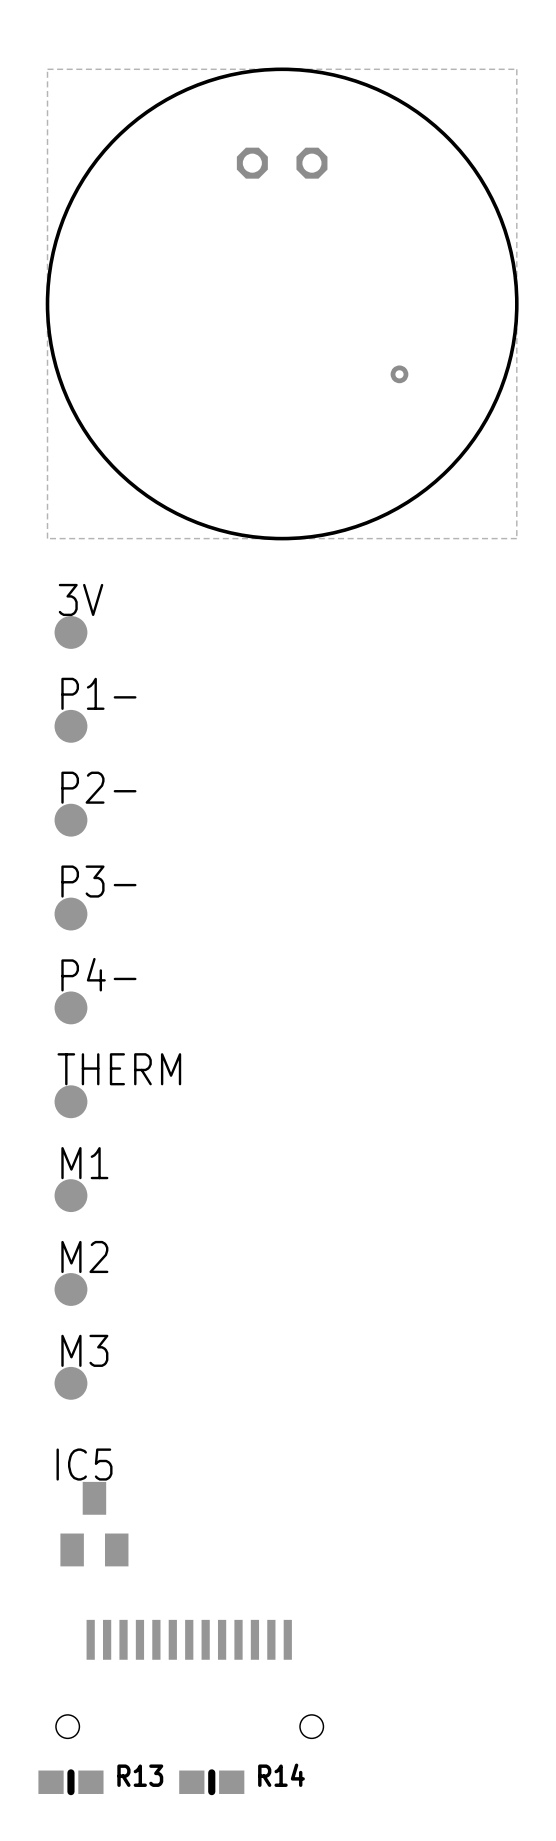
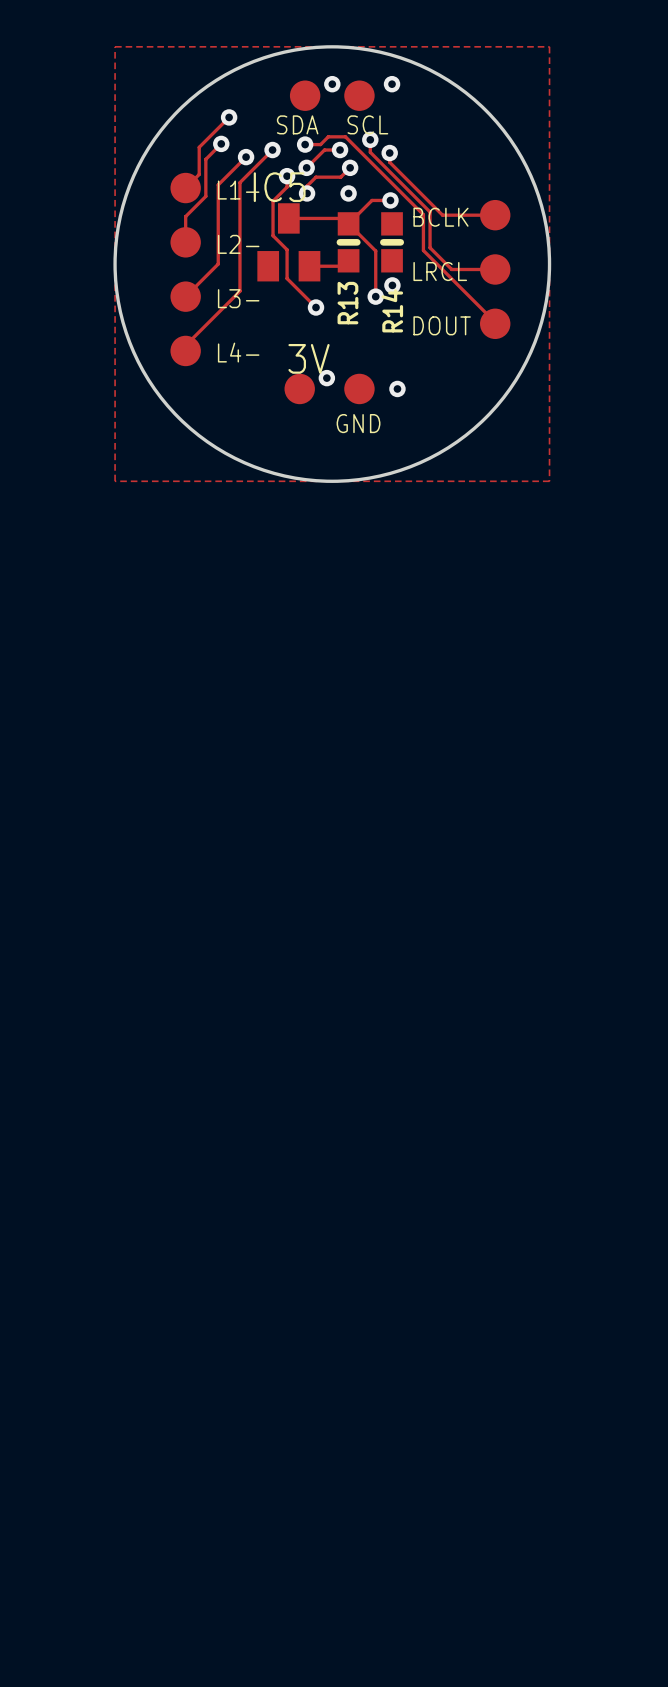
via: none -> (332, 84)
via: none -> (392, 84)
SDA: none -> (305, 95)
SCL: none -> (359, 95)
track: none -> (229, 117) (199, 147) (199, 174) (185, 188)
via: none -> (229, 117)
part: (282, 163) -> none
track: none -> (370, 139) (370, 152) (430, 212) (430, 247) (451, 269) (495, 269)
via: none -> (370, 139)
track: none -> (221, 143) (205, 159) (205, 196) (185, 216) (185, 242)
via: none -> (221, 143)
track: none -> (305, 144) (320, 144) (328, 136) (345, 136) (423, 214) (423, 250) (495, 323)
via: none -> (305, 144)
track: none -> (272, 150) (239, 182) (239, 291) (185, 345) (185, 350)
via: none -> (272, 150)
track: none -> (340, 150) (324, 150) (306, 167)
via: none -> (340, 150)
track: none -> (389, 153) (389, 162) (442, 215) (495, 215)
via: none -> (389, 153)
track: none -> (246, 157) (218, 184) (218, 264) (185, 296)
via: none -> (246, 157)
via: none -> (306, 167)
track: none -> (350, 167) (340, 177) (316, 177) (307, 186) (307, 193)
via: none -> (350, 167)
track: none -> (287, 176) (287, 187) (273, 201) (273, 235) (287, 249) (287, 278) (316, 307)
via: none -> (287, 176)
L1-: none -> (185, 188)
via: none -> (307, 193)
via: none -> (348, 193)
track: none -> (390, 200) (372, 200) (348, 223)
via: none -> (390, 200)
BCLK: none -> (495, 215)
track: none -> (288, 218) (343, 218) (375, 251) (375, 296)
L2-: none -> (185, 242)
track: none -> (348, 260) (343, 266) (309, 266)
LRCL: none -> (495, 269)
via: none -> (392, 285)
L3-: none -> (185, 296)
via: none -> (375, 296)
via: none -> (316, 307)
DOUT: none -> (495, 323)
via: (399, 374) -> none
L4-: none -> (185, 350)
via: none -> (326, 378)
GND: none -> (359, 388)
via: none -> (397, 388)
3V position: (70, 632) -> (299, 388)
P1-: (70, 726) -> none
P2-: (70, 820) -> none
P3-: (70, 914) -> none
P4-: (70, 1007) -> none
THERM: (70, 1101) -> none
M1: (70, 1195) -> none
M2: (70, 1289) -> none
M3: (70, 1383) -> none
IC5 position: (94, 1524) -> (288, 242)
part: (189, 1679) -> none
R13 rotation: 0° (70, 1782) -> 90° clockwise (348, 242)
R13 position: (70, 1782) -> (348, 242)
R14 rotation: 0° (211, 1782) -> 90° clockwise (392, 242)
R14 position: (211, 1782) -> (392, 242)

